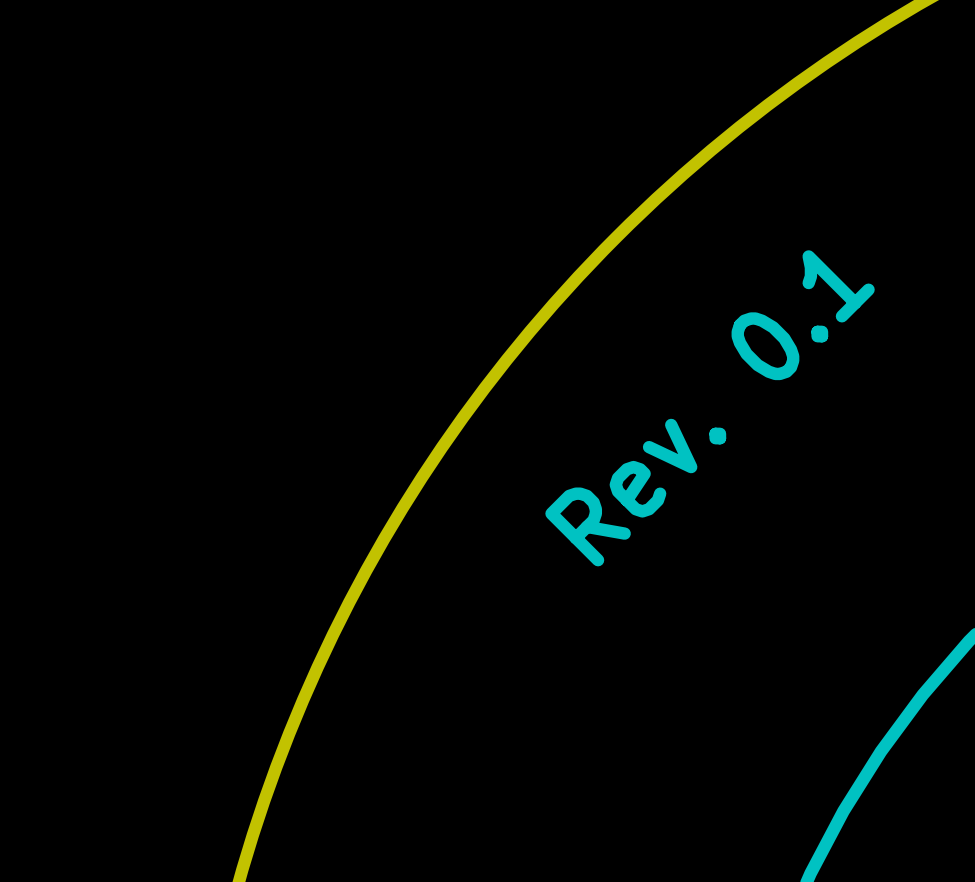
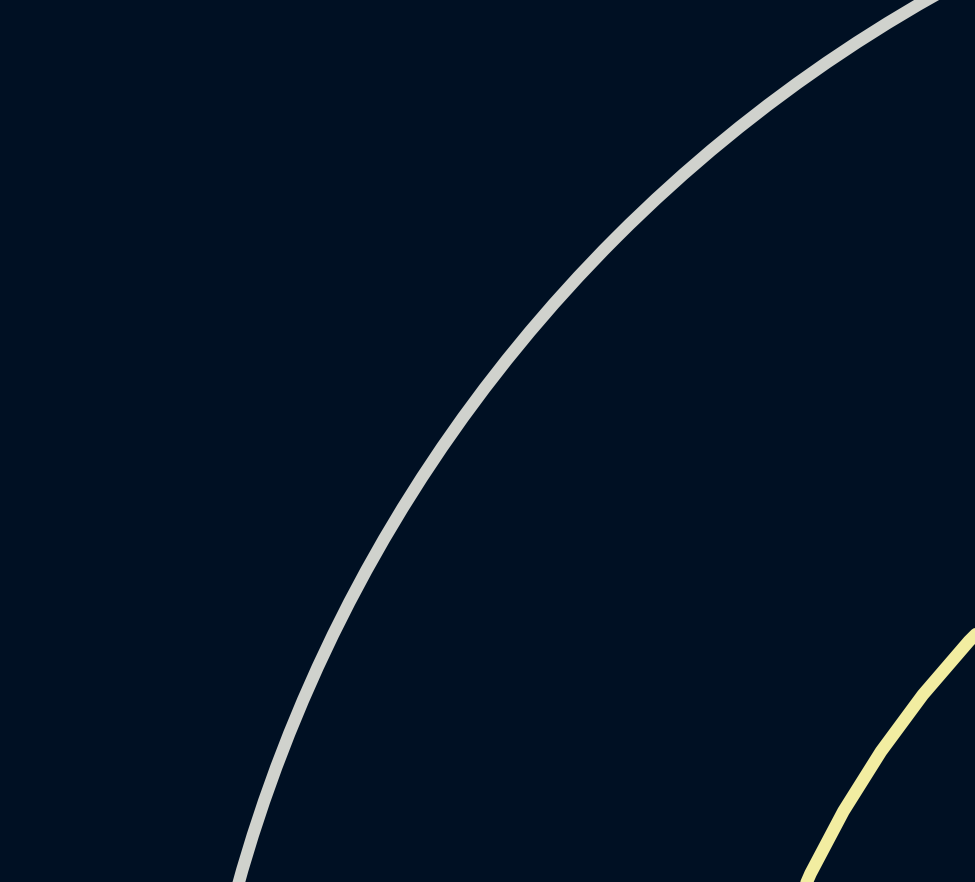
text: Rev. 0.1 (710, 408) -> none

